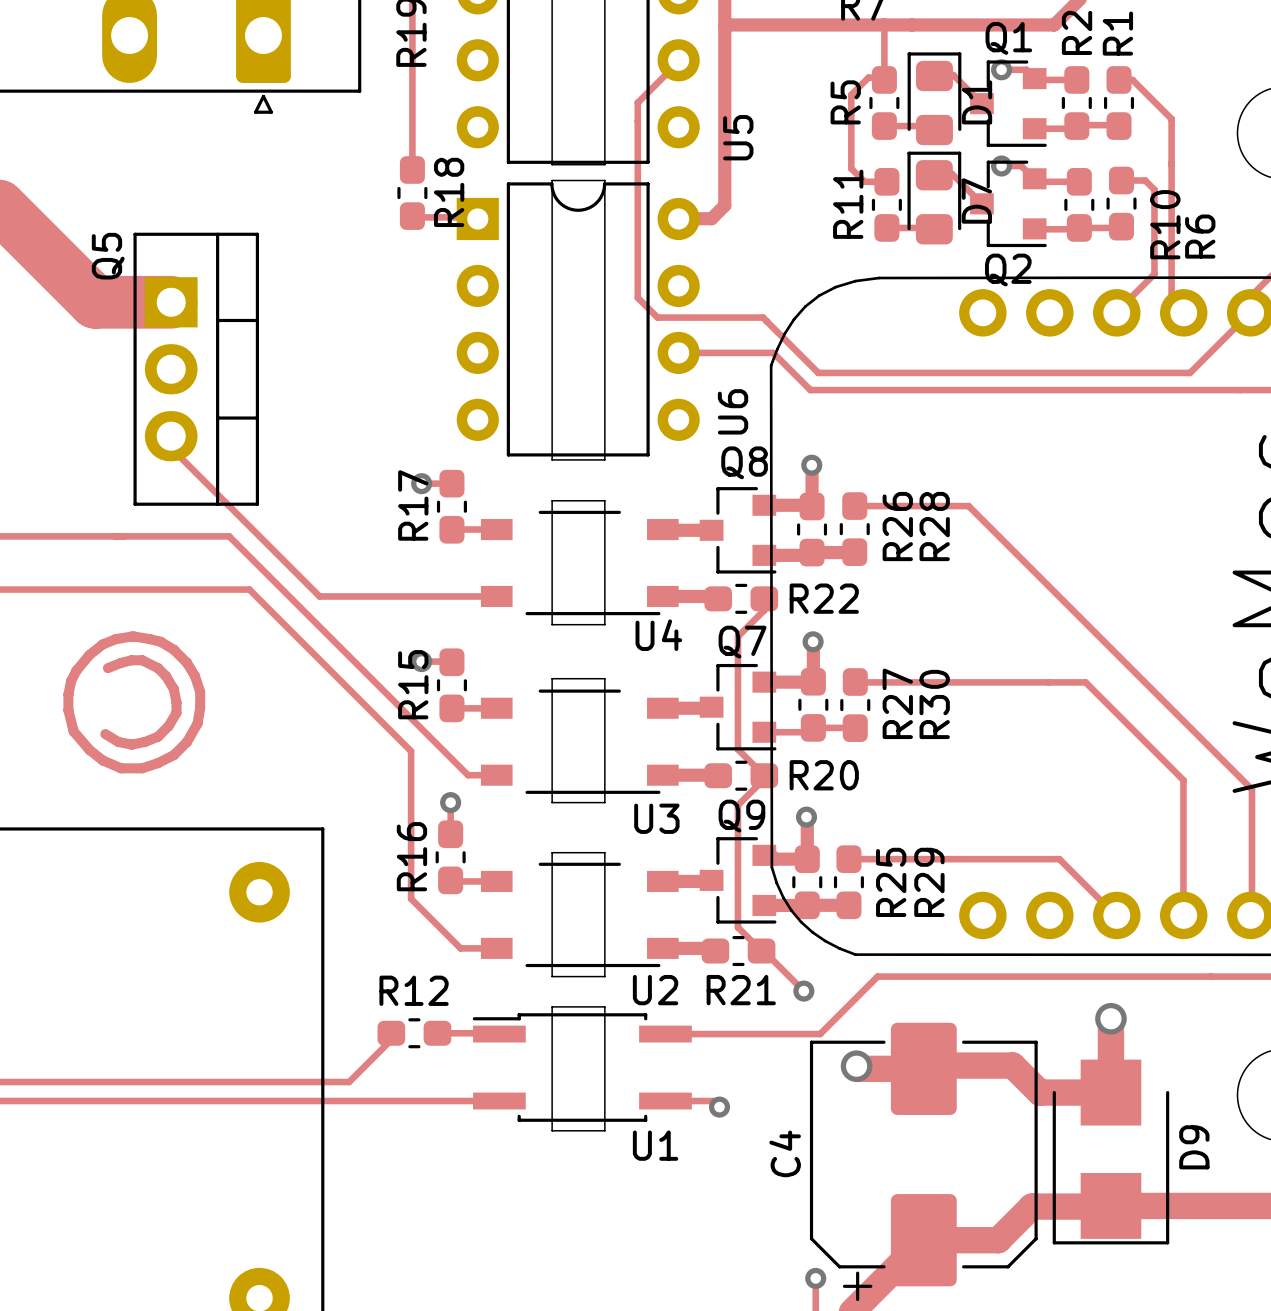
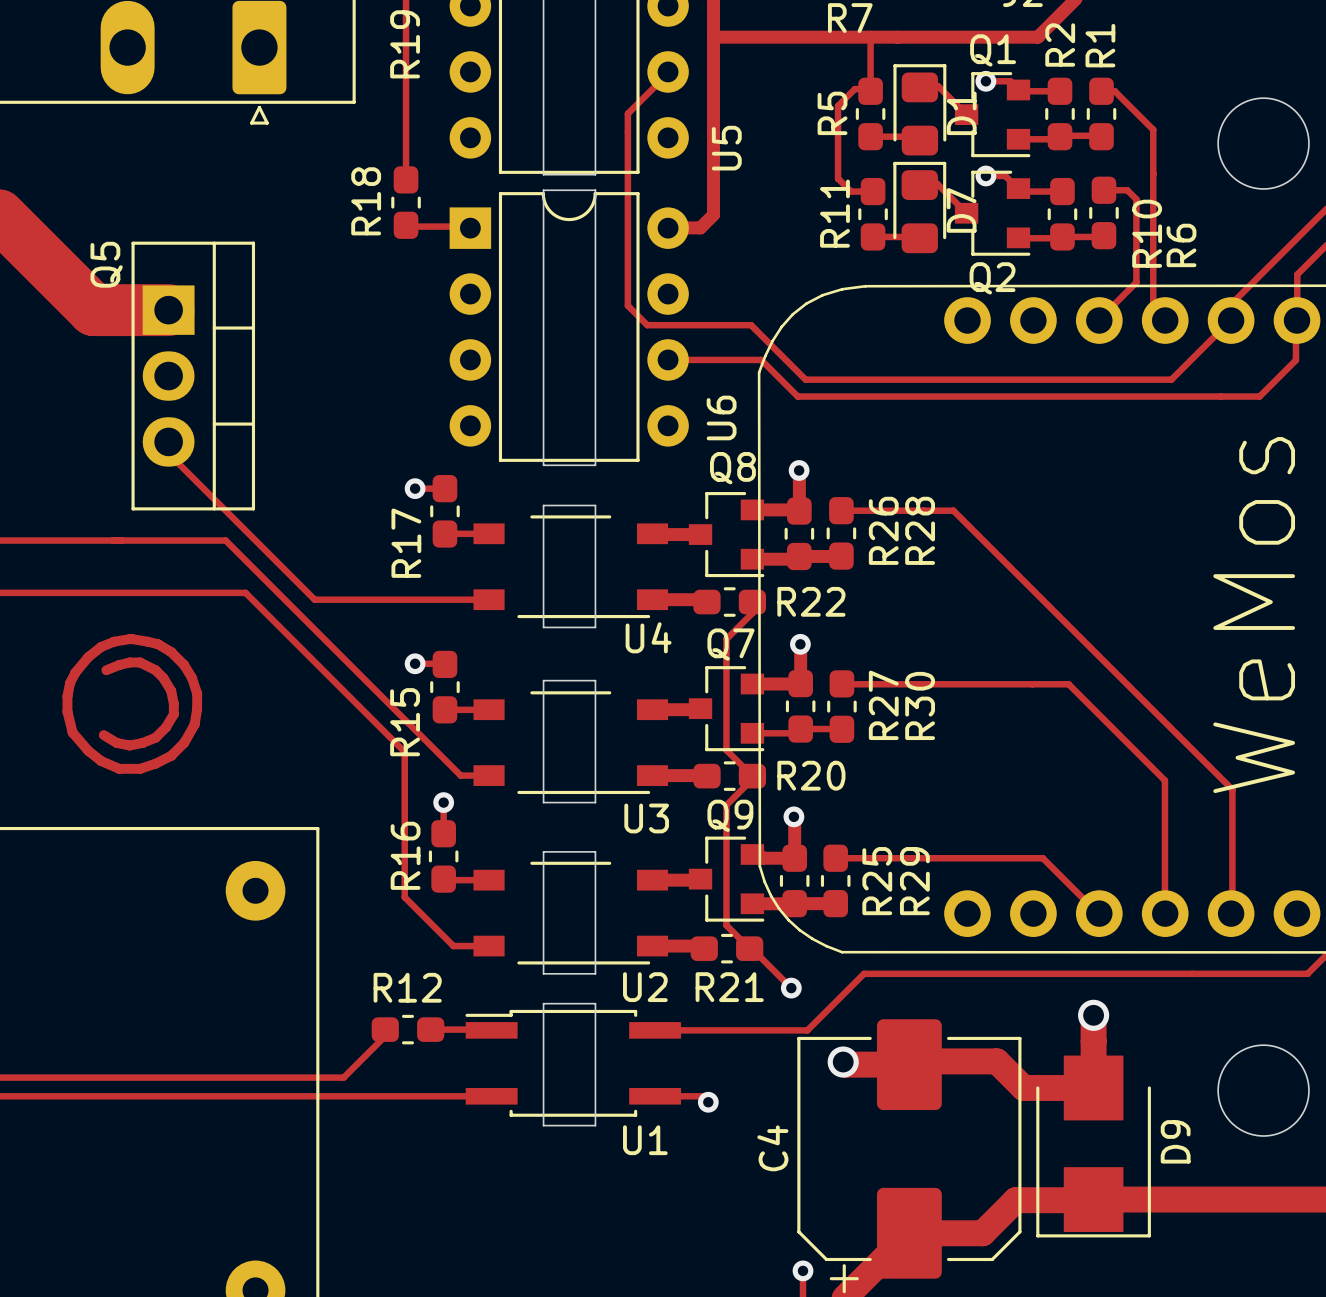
R18 name position: R18 (449, 192) -> R18 (366, 201)
R17 name position: R17 (413, 505) -> R17 (406, 543)
R15 name position: R15 (413, 684) -> R15 (405, 722)

